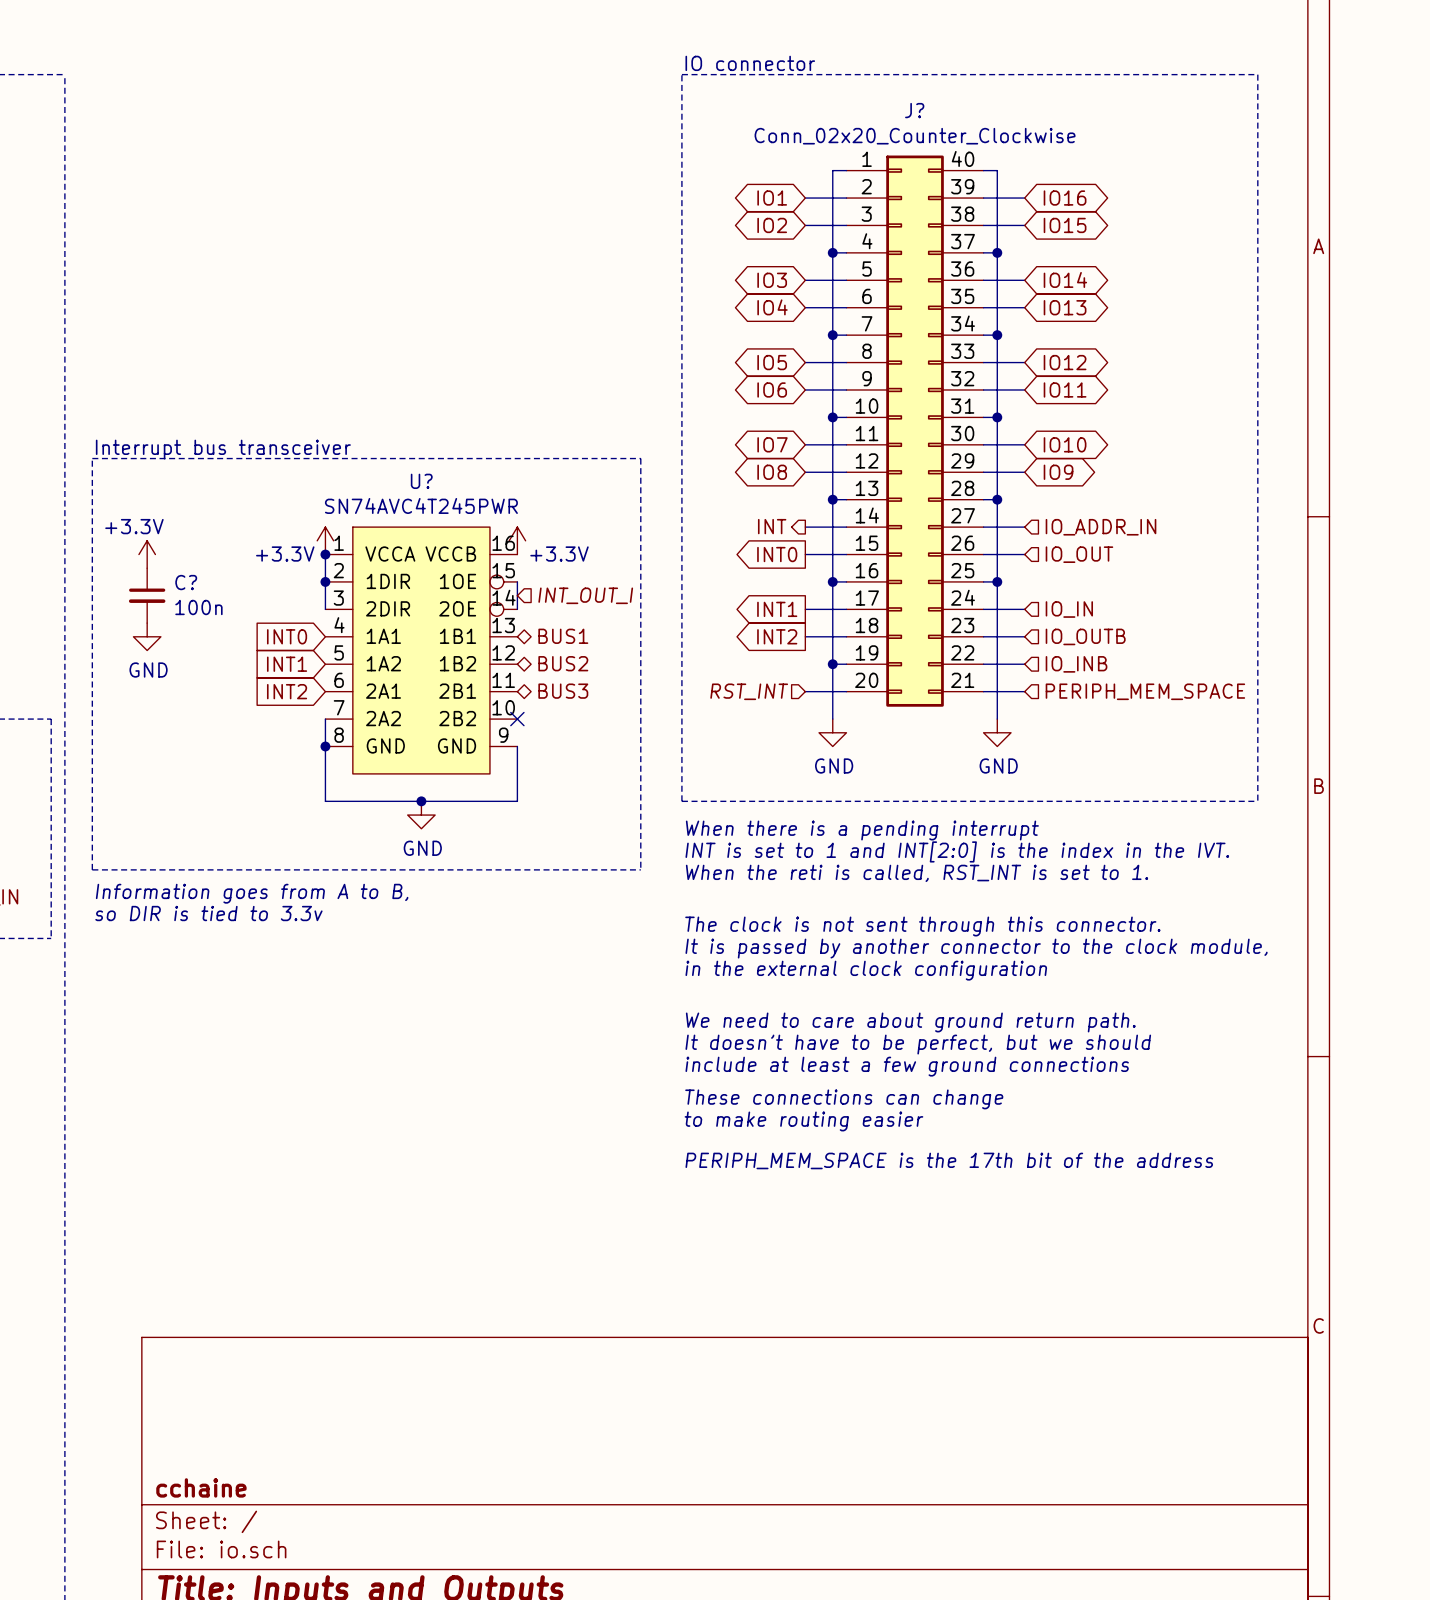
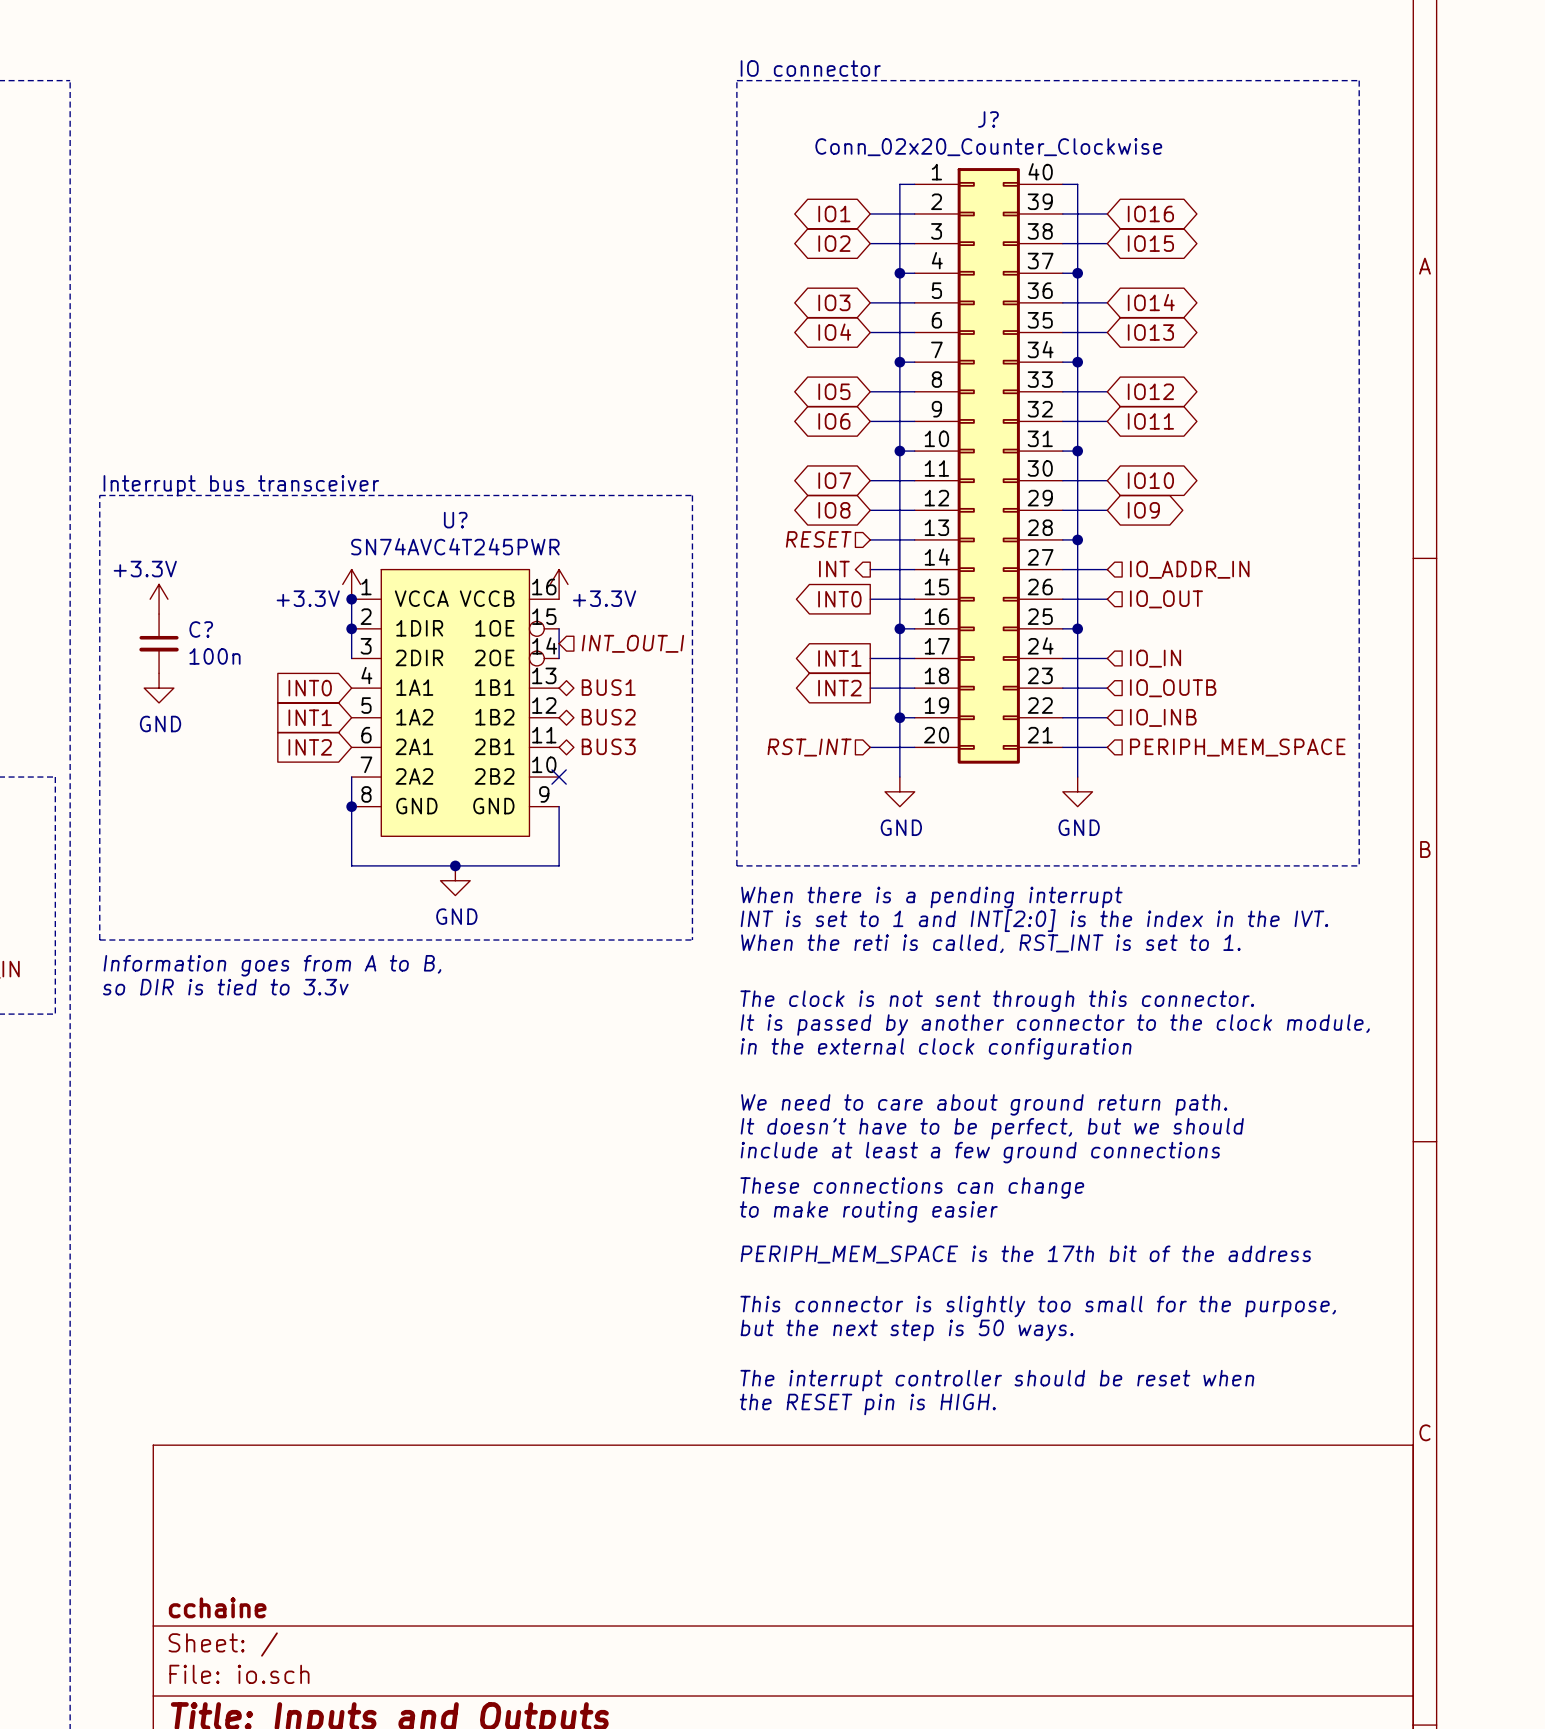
hierarchical label: none -> RESET (818, 539)
wire: none -> (870, 539) (899, 539)
junction: (832, 499) -> none
text: none -> This connector is slightly too small for the purpose, (1038, 1306)
text: none -> but the next step is 50 ways. (907, 1330)
text: none -> The interrupt controller should be reset when (997, 1380)
text: none -> the RESET pin is HIGH. (867, 1404)

